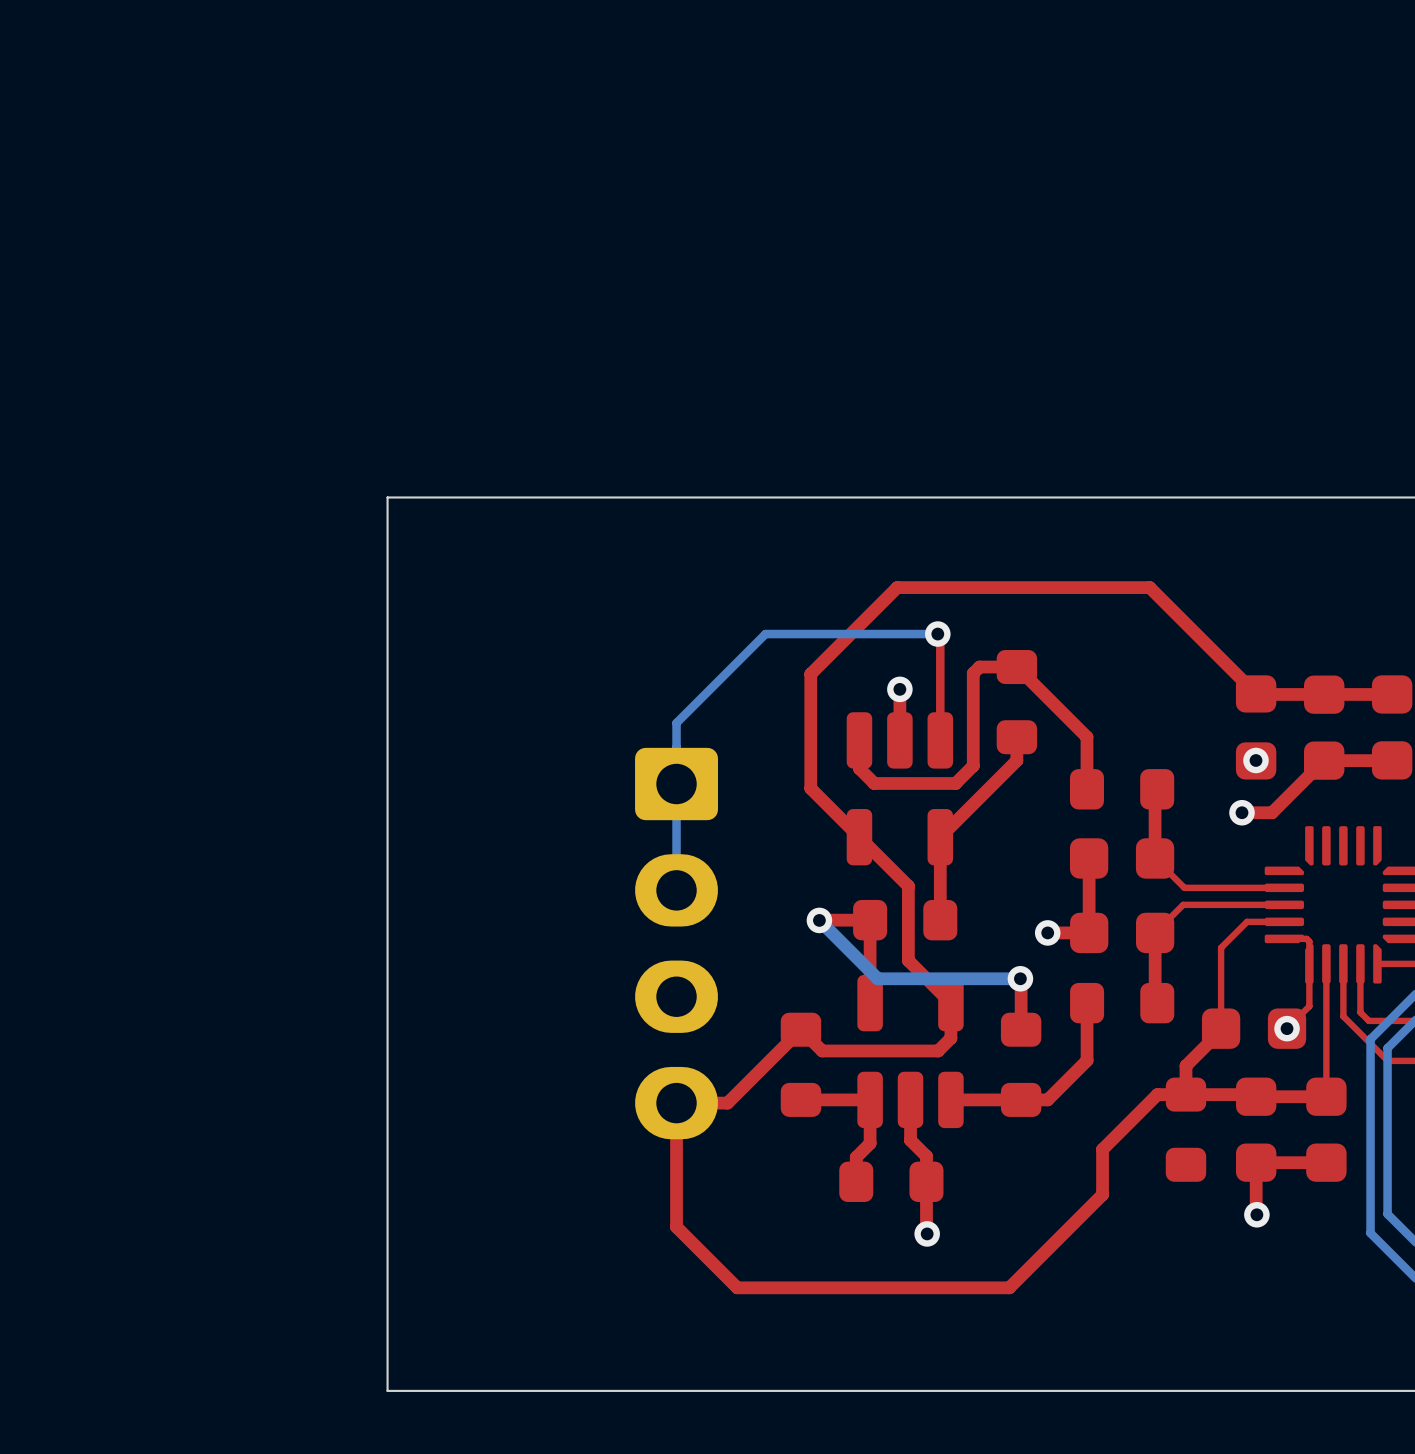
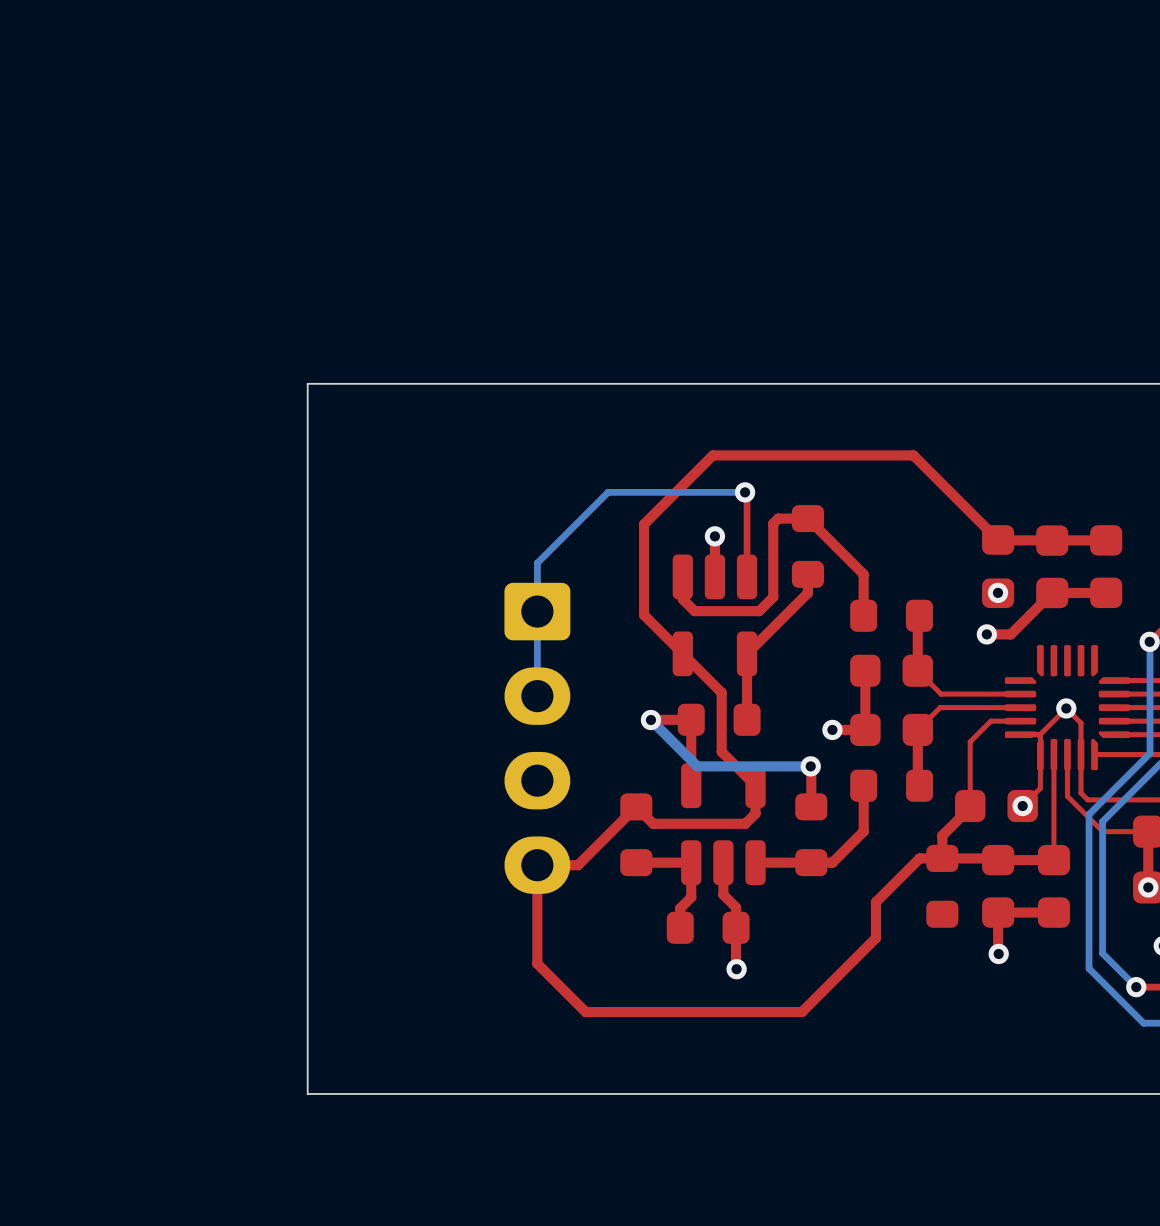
via: none -> (1066, 708)
top track: none -> (1038, 734) (1066, 708) (1081, 723) (1081, 754)

